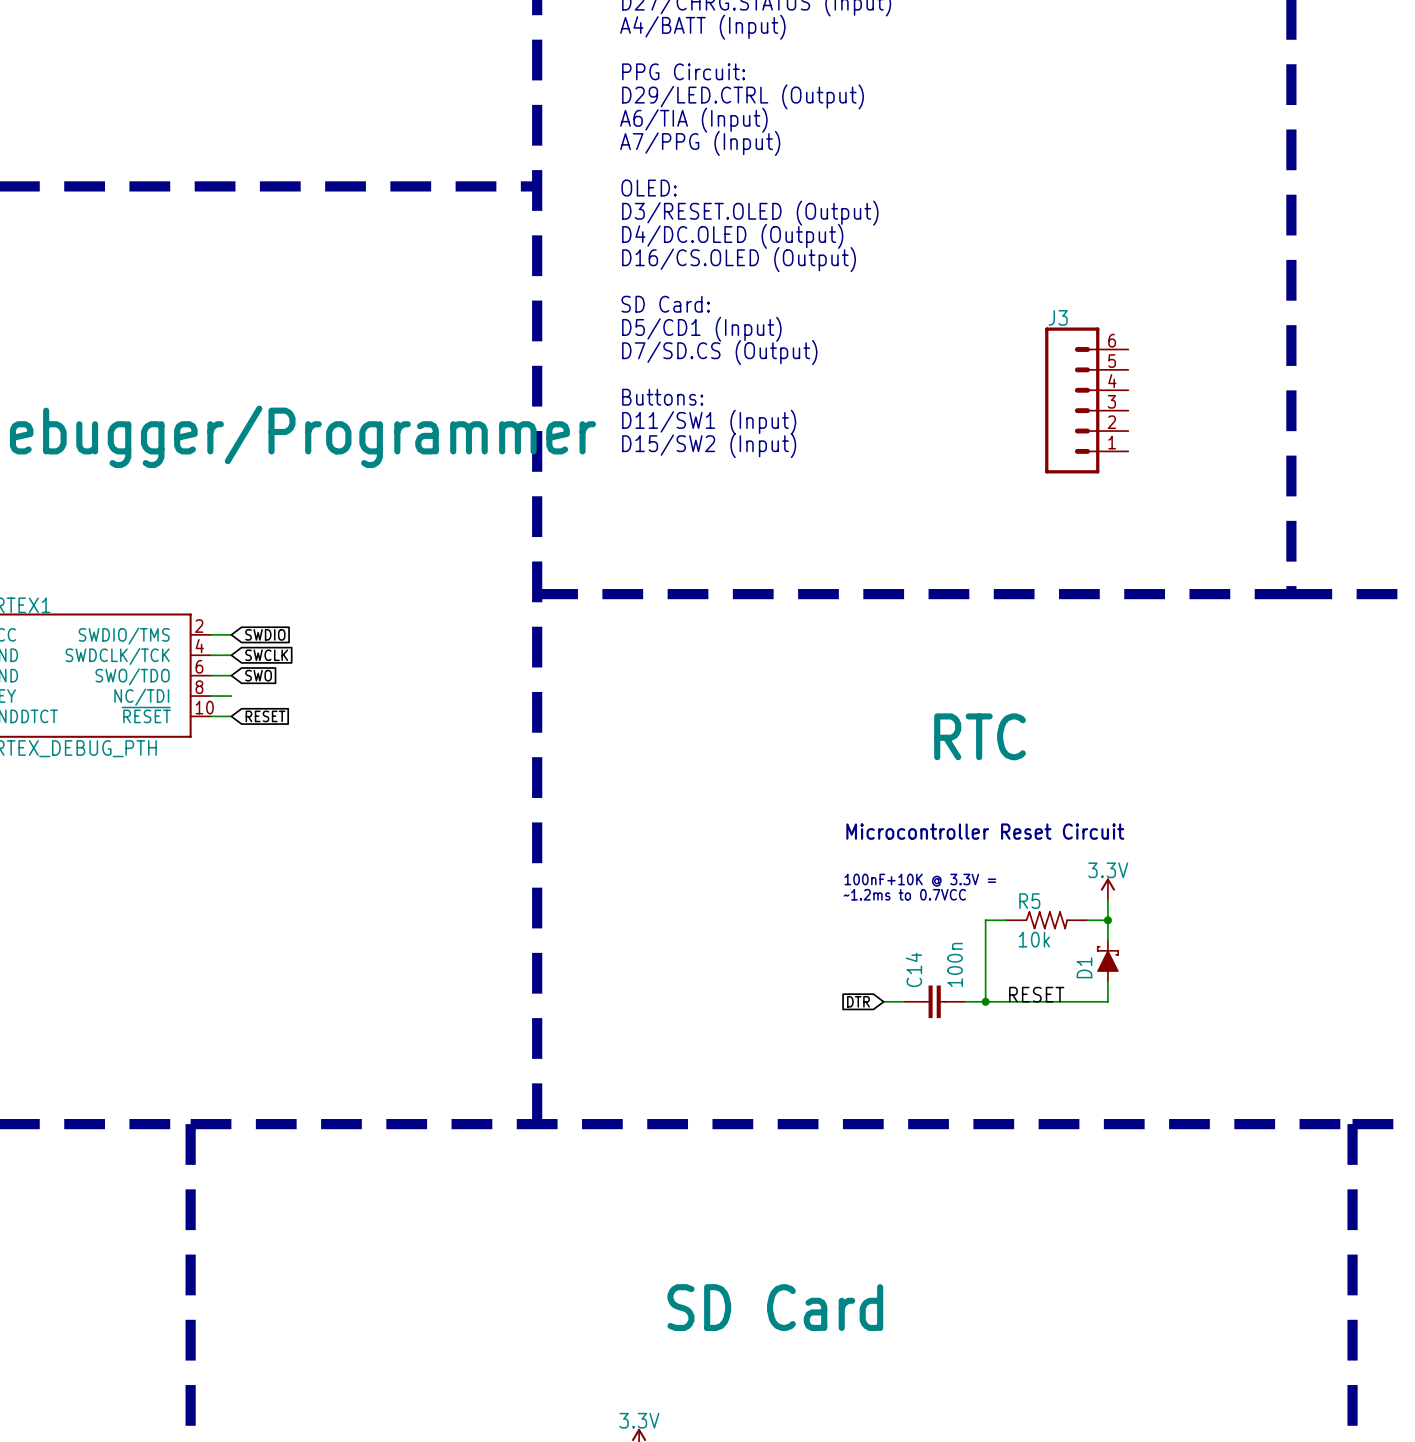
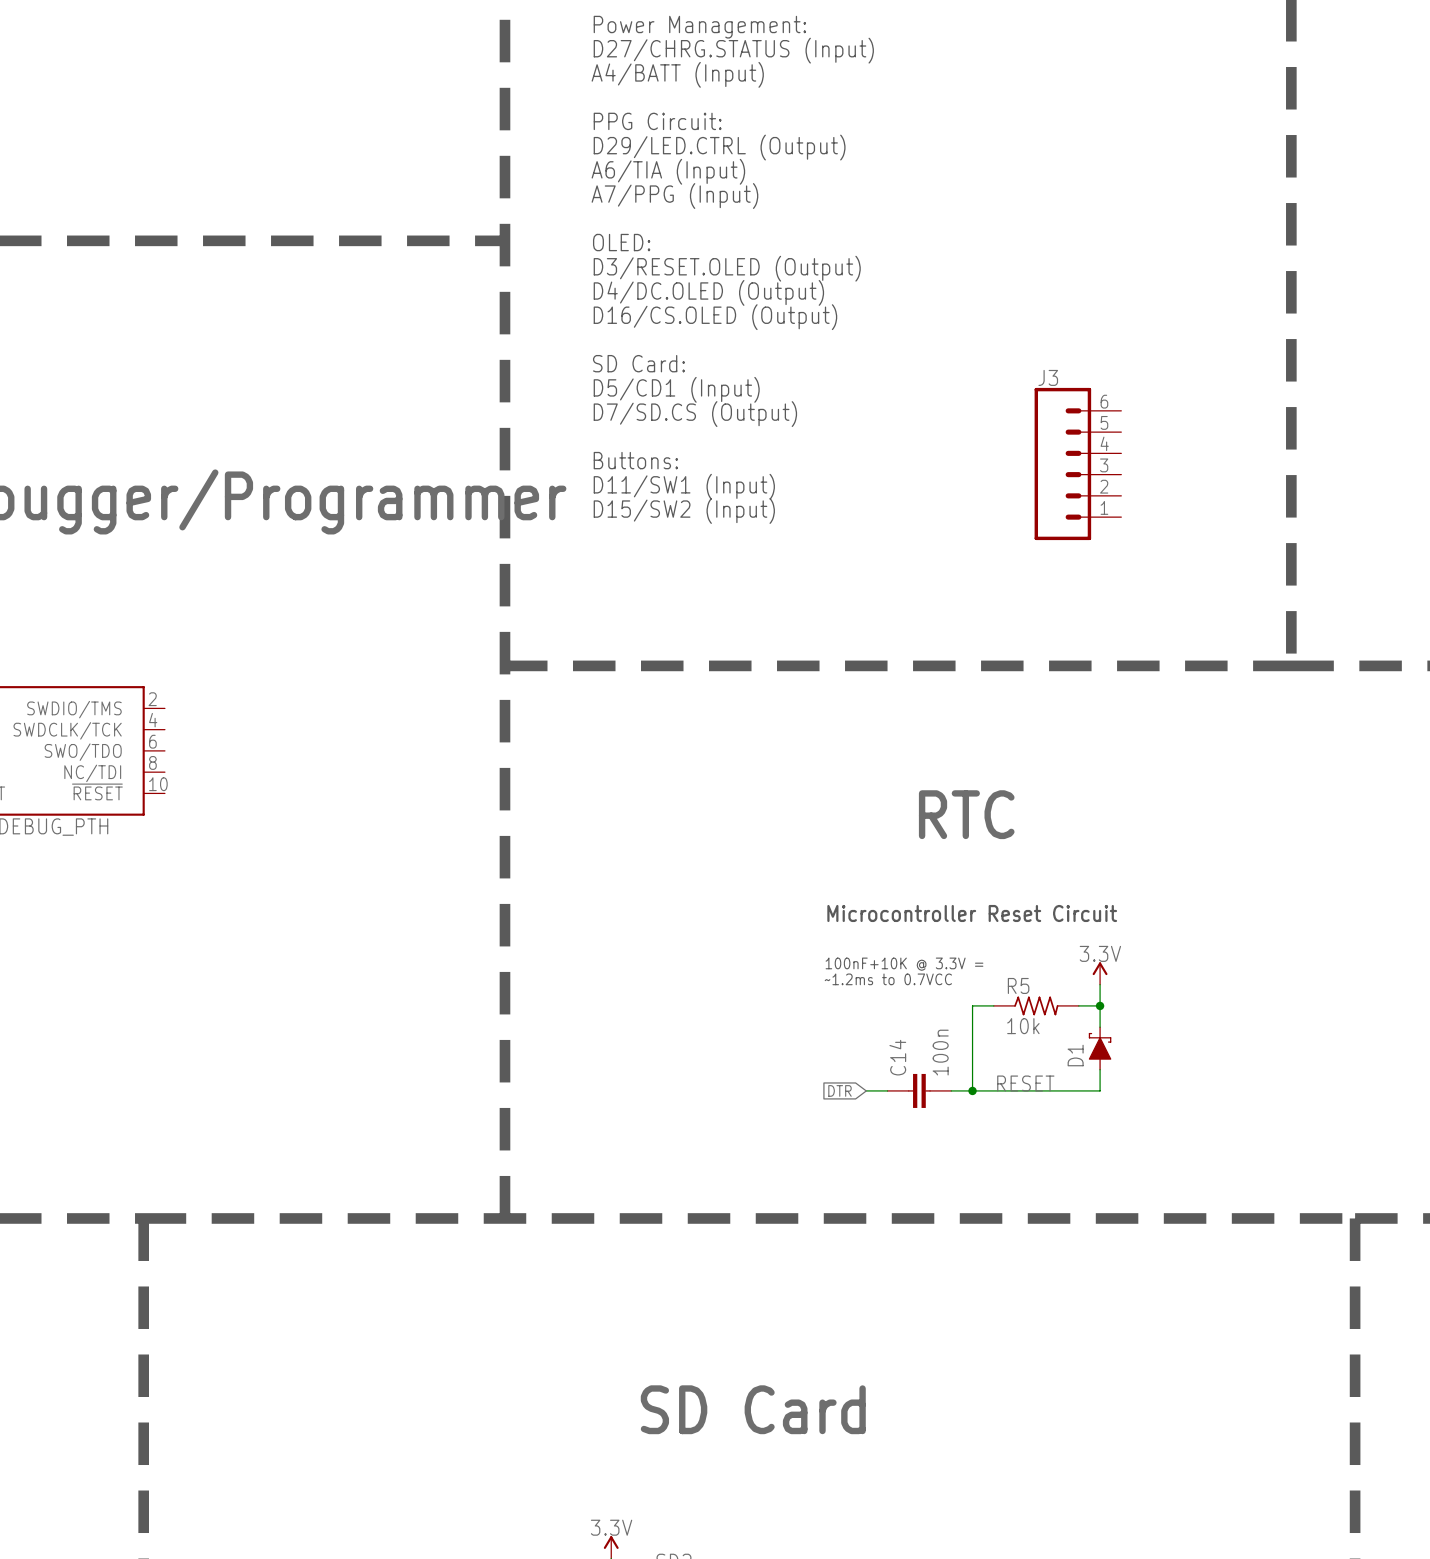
wire: (211, 634) (231, 634) -> none
global label: SWDIO (265, 634) -> none
wire: (211, 655) (231, 655) -> none
global label: SWCLK (266, 655) -> none
wire: (211, 675) (231, 675) -> none
global label: SWO (258, 675) -> none
wire: (211, 696) (231, 696) -> none
wire: (211, 716) (231, 716) -> none
global label: RESET (265, 716) -> none

